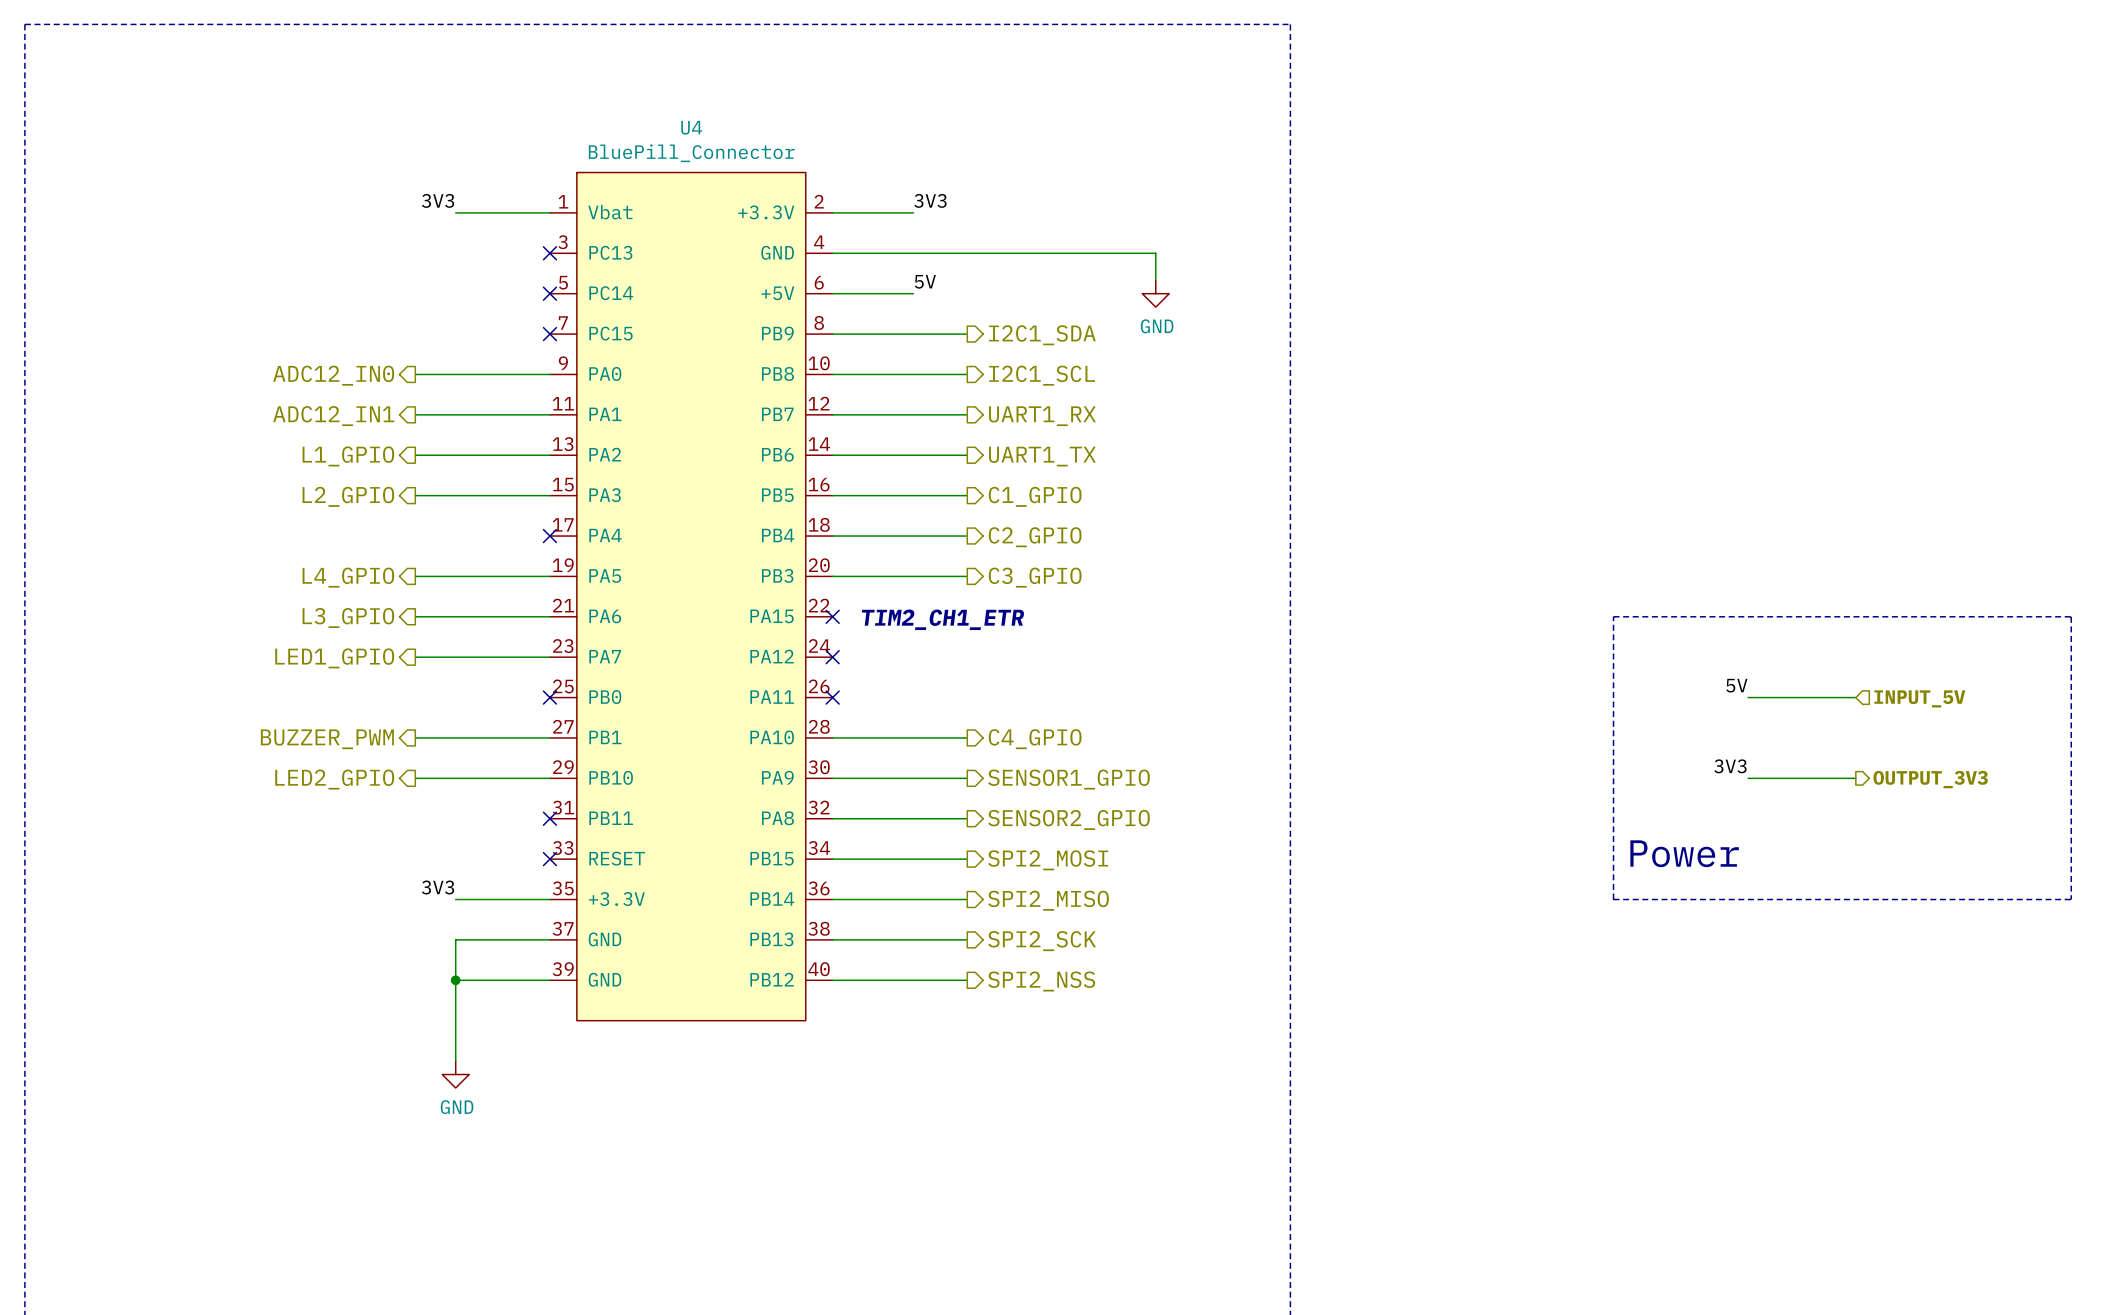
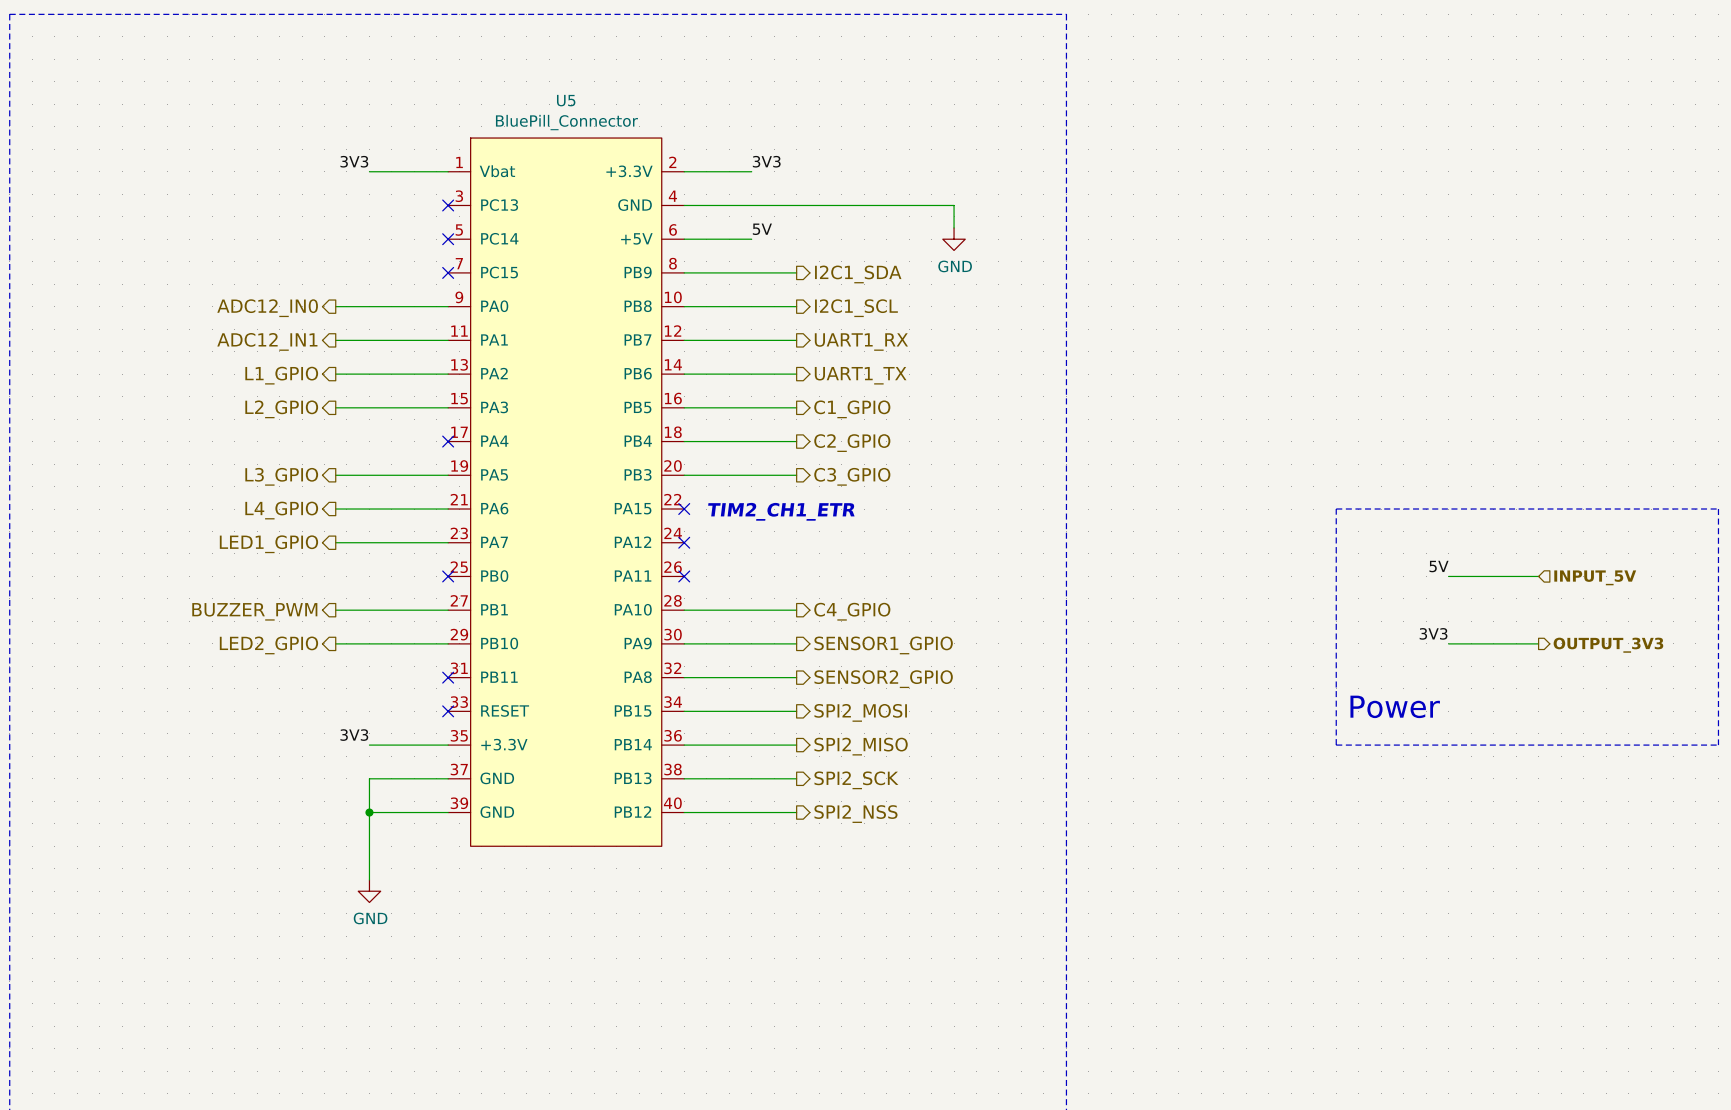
U4 name: U4 (691, 127) -> U5 (566, 100)
hierarchical label: L4_GPIO (348, 577) -> L3_GPIO (281, 476)
hierarchical label: L3_GPIO (348, 617) -> L4_GPIO (281, 510)

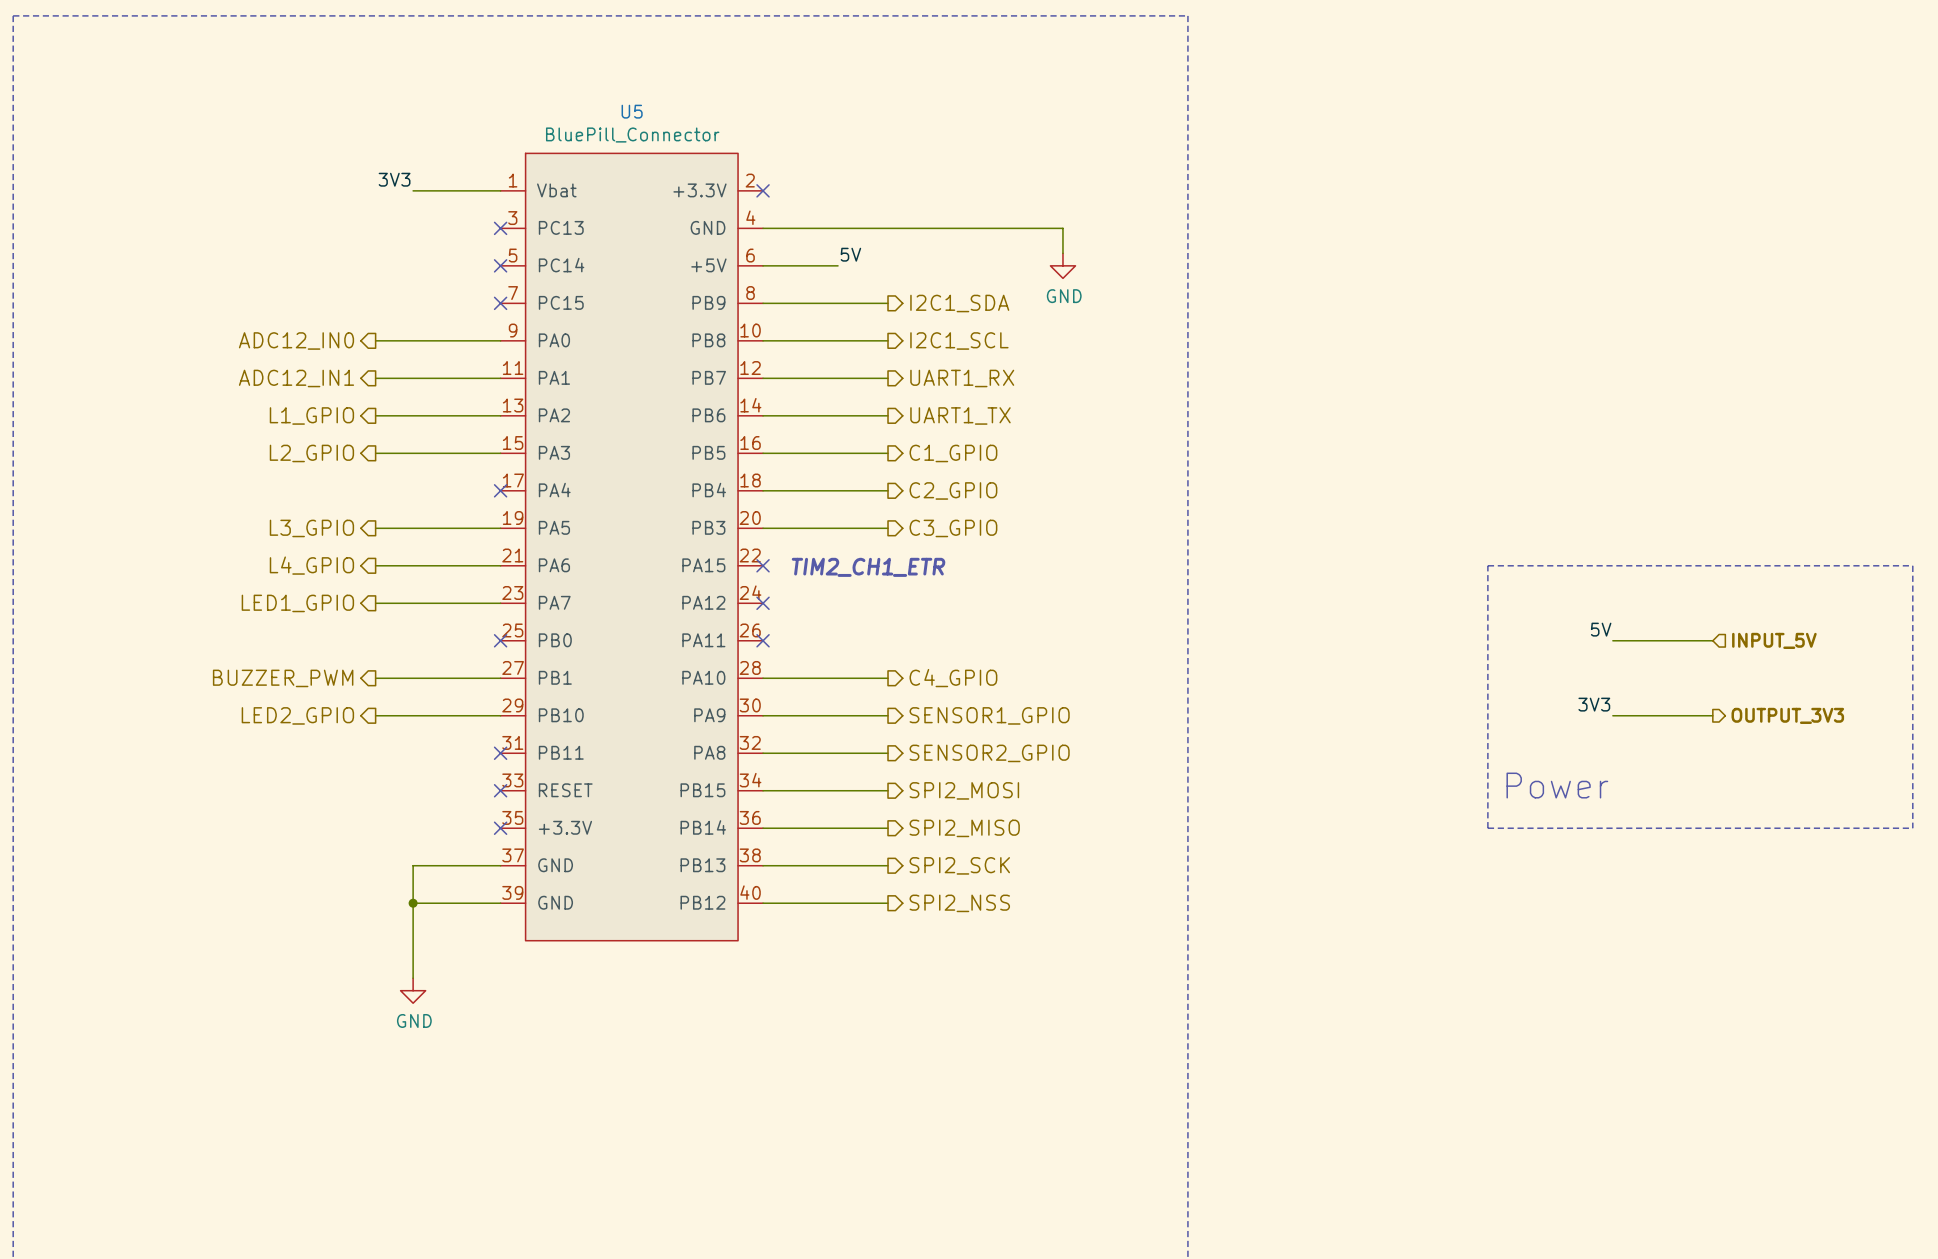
label: 3V3 (766, 161) -> none
wire: (684, 171) (751, 171) -> none
no-connect mark: none -> (763, 190)
label: 3V3 (354, 735) -> none
wire: (369, 745) (448, 745) -> none
no-connect mark: none -> (500, 828)

